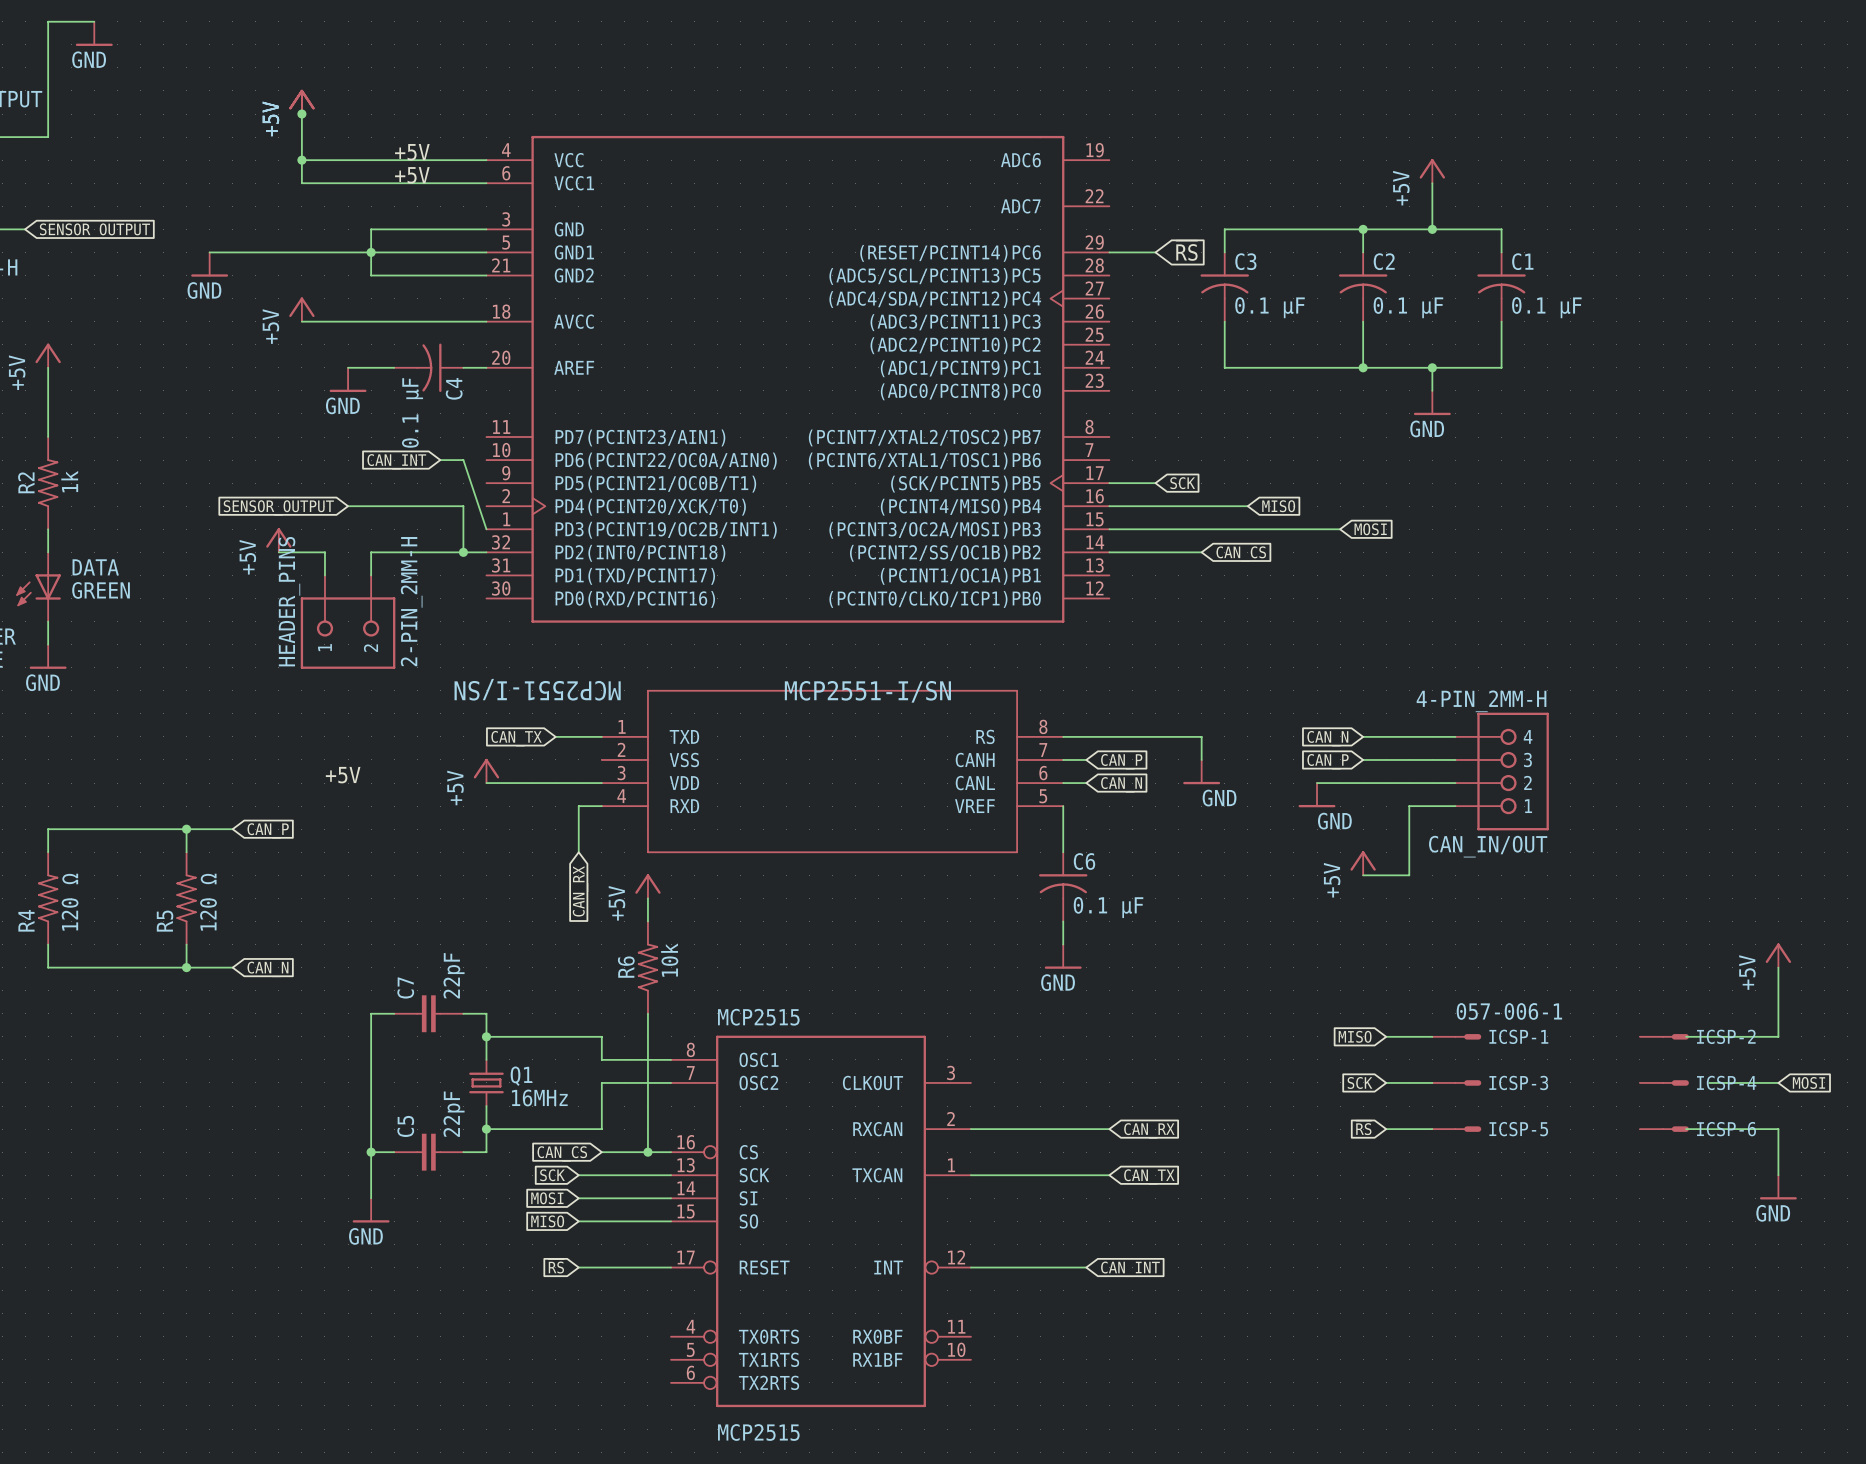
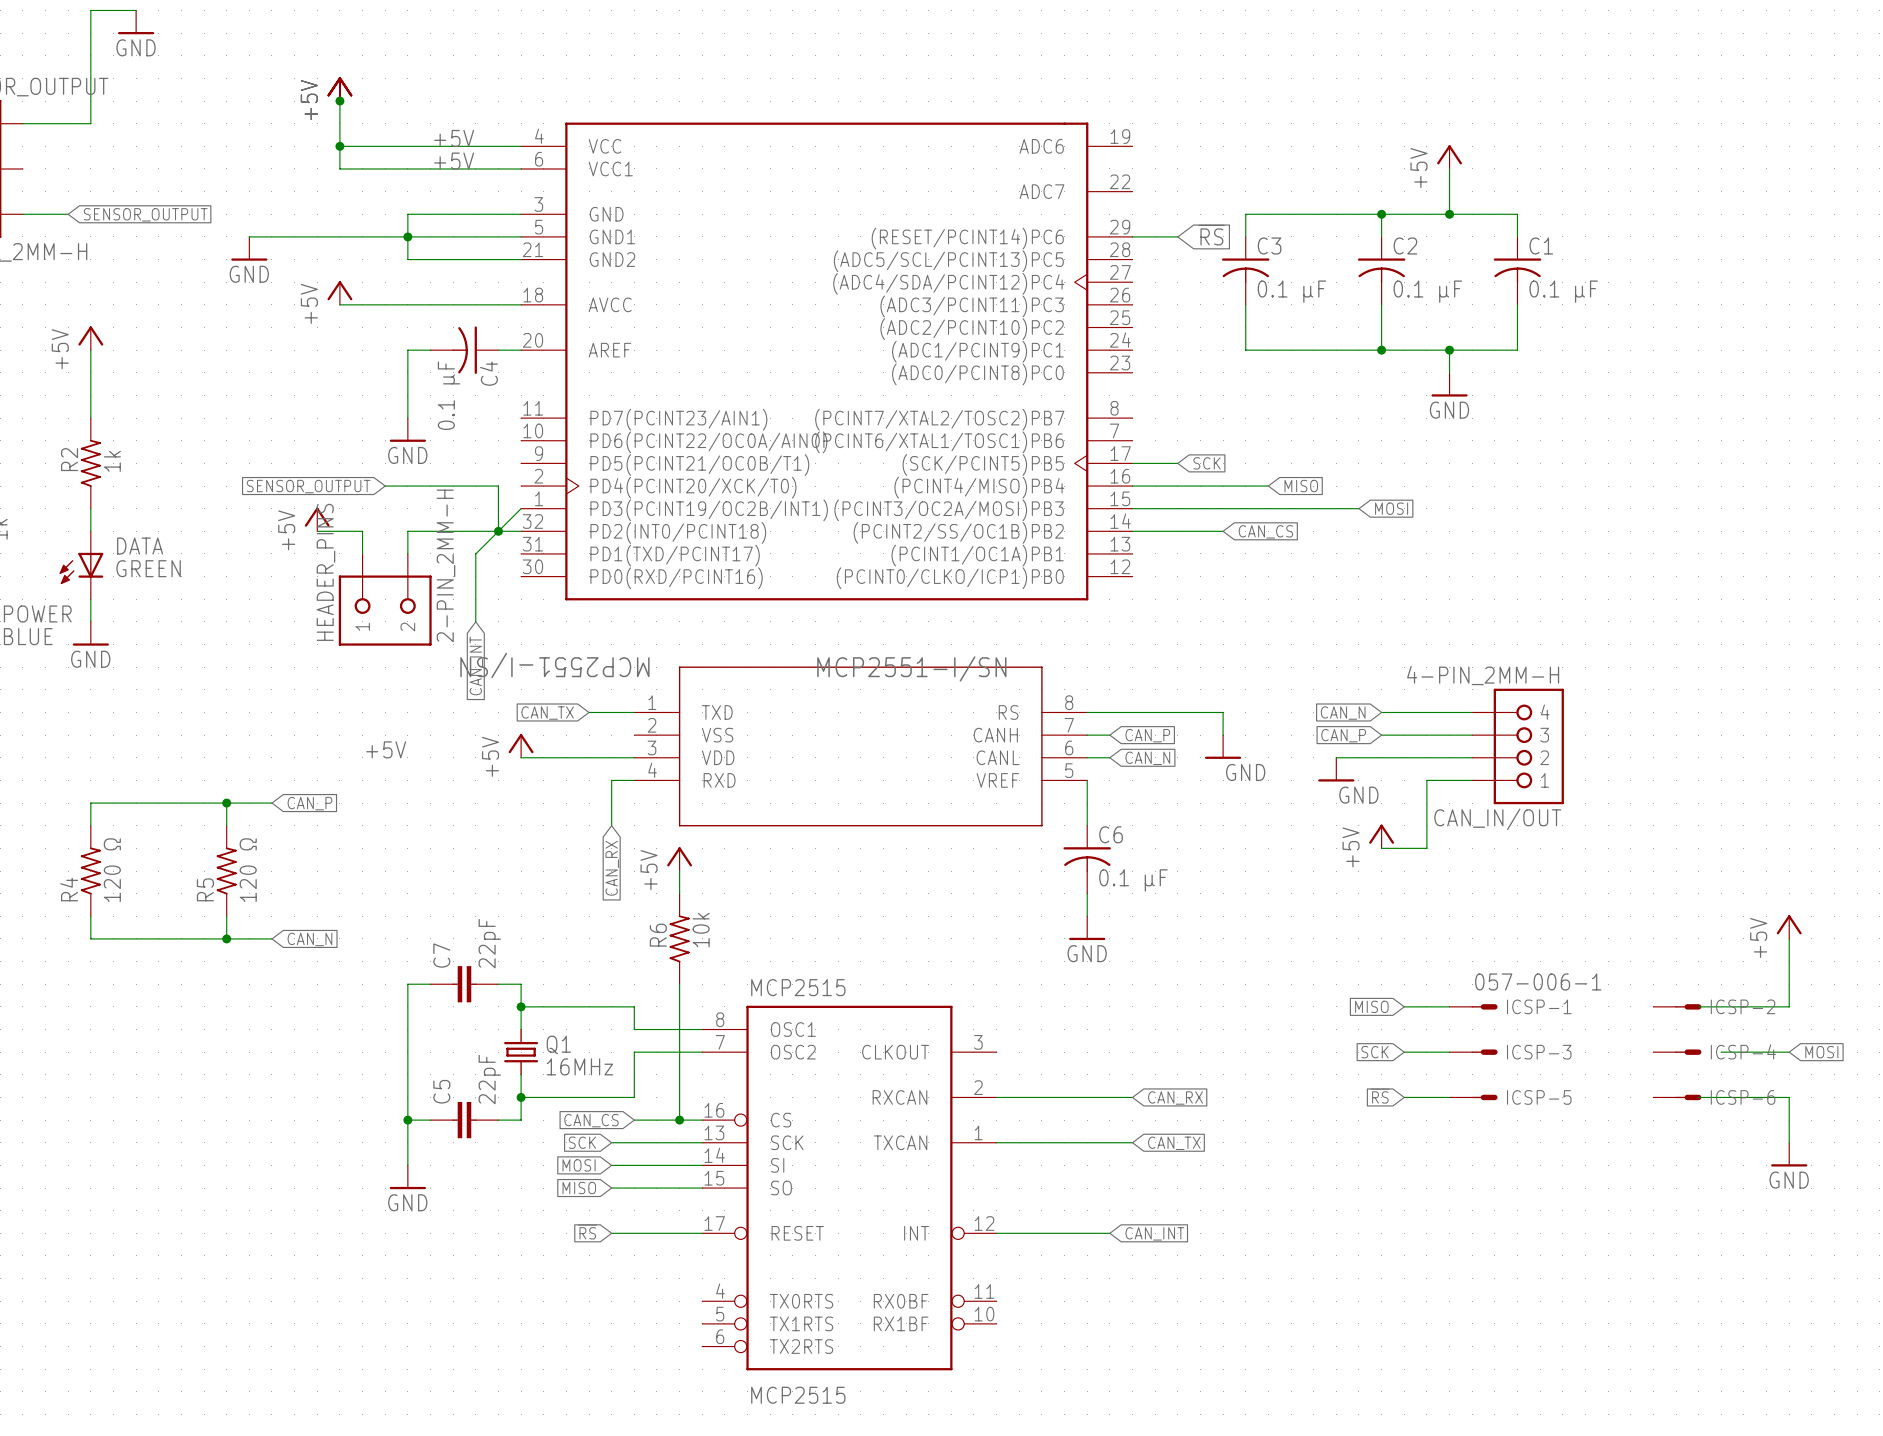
wire: (348, 367) (371, 367) -> (407, 418) (407, 350)
power symbol position: GND (348, 379) -> GND (407, 429)
wire: (440, 460) (463, 460) (486, 529) -> (475, 621) (475, 553) (521, 508)
global label rotation: 0° (396, 461) -> 90° counterclockwise (476, 665)
global label position: CAN_INT (396, 461) -> CAN_INT (476, 665)

